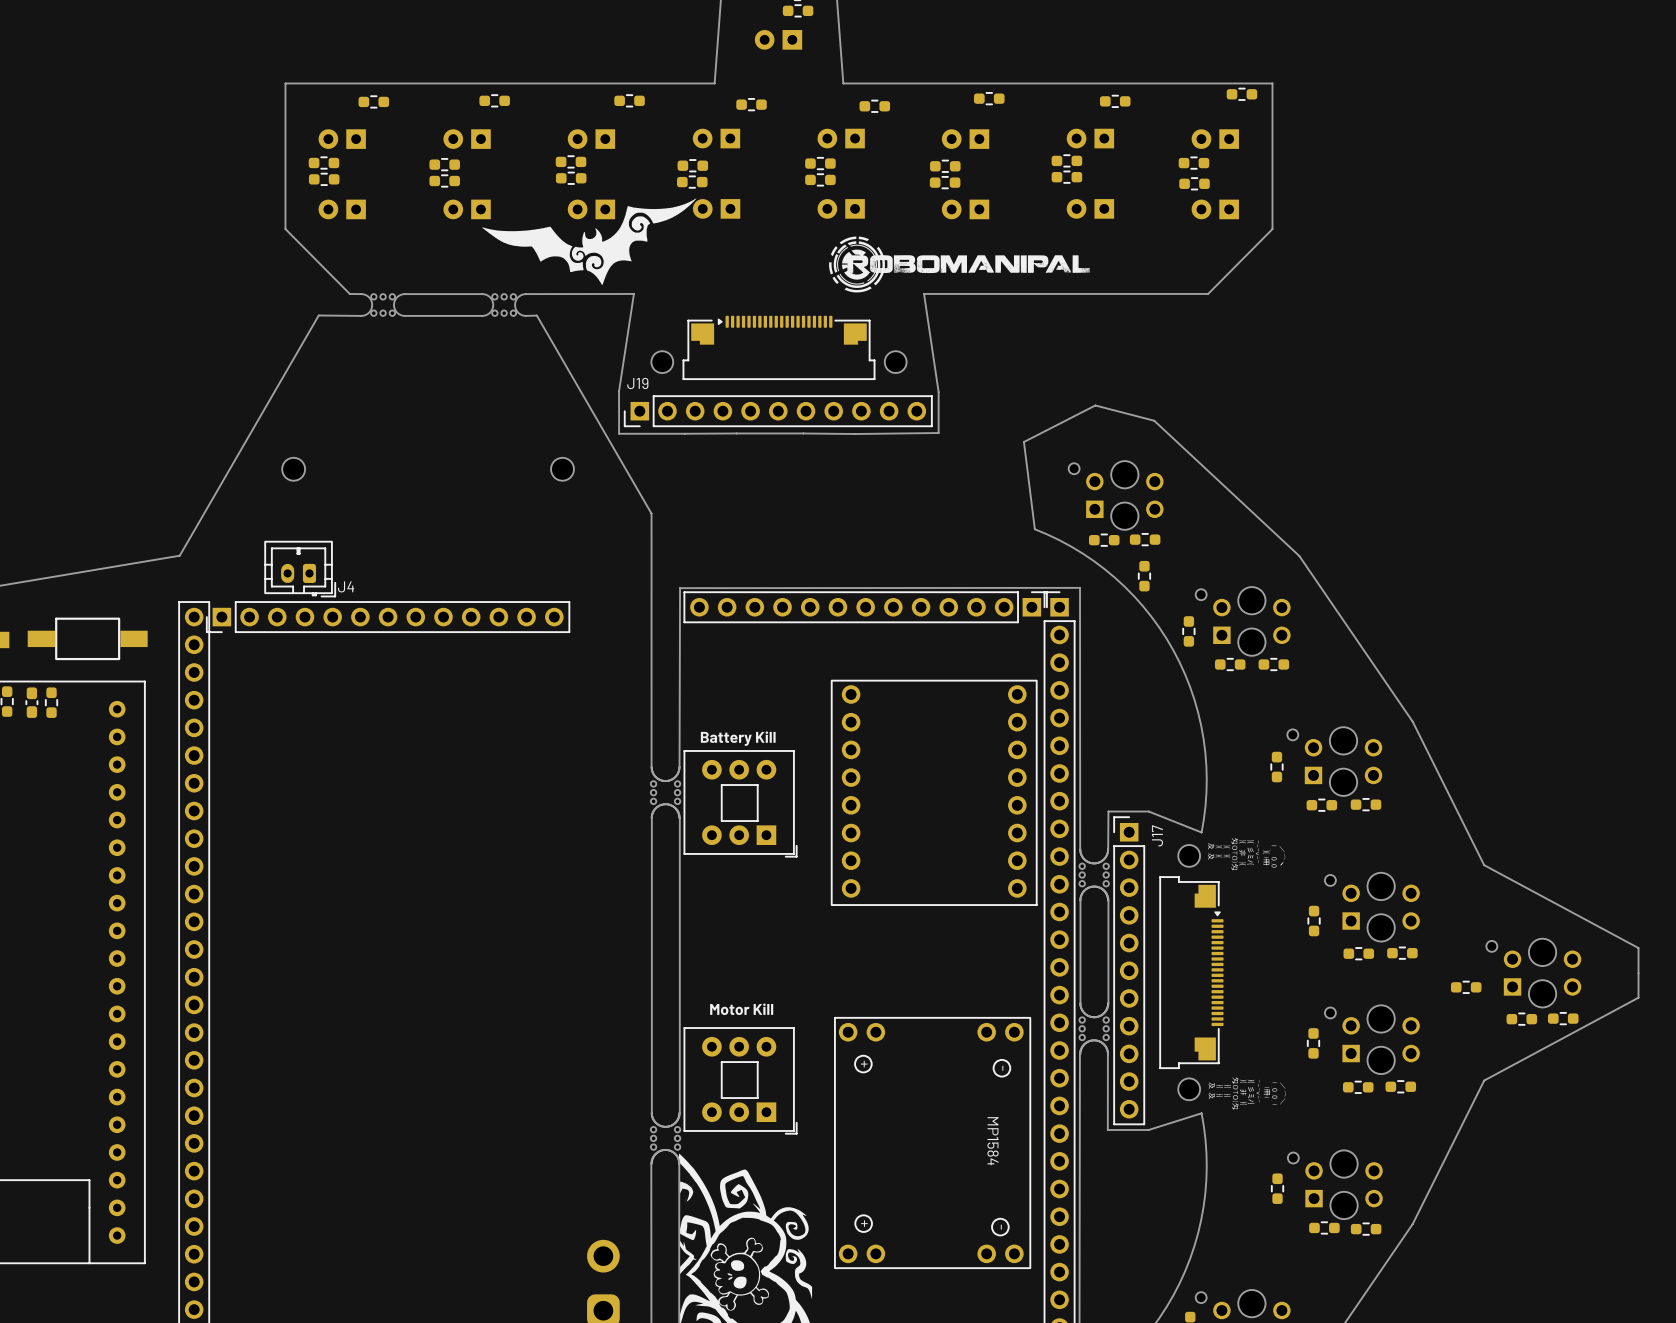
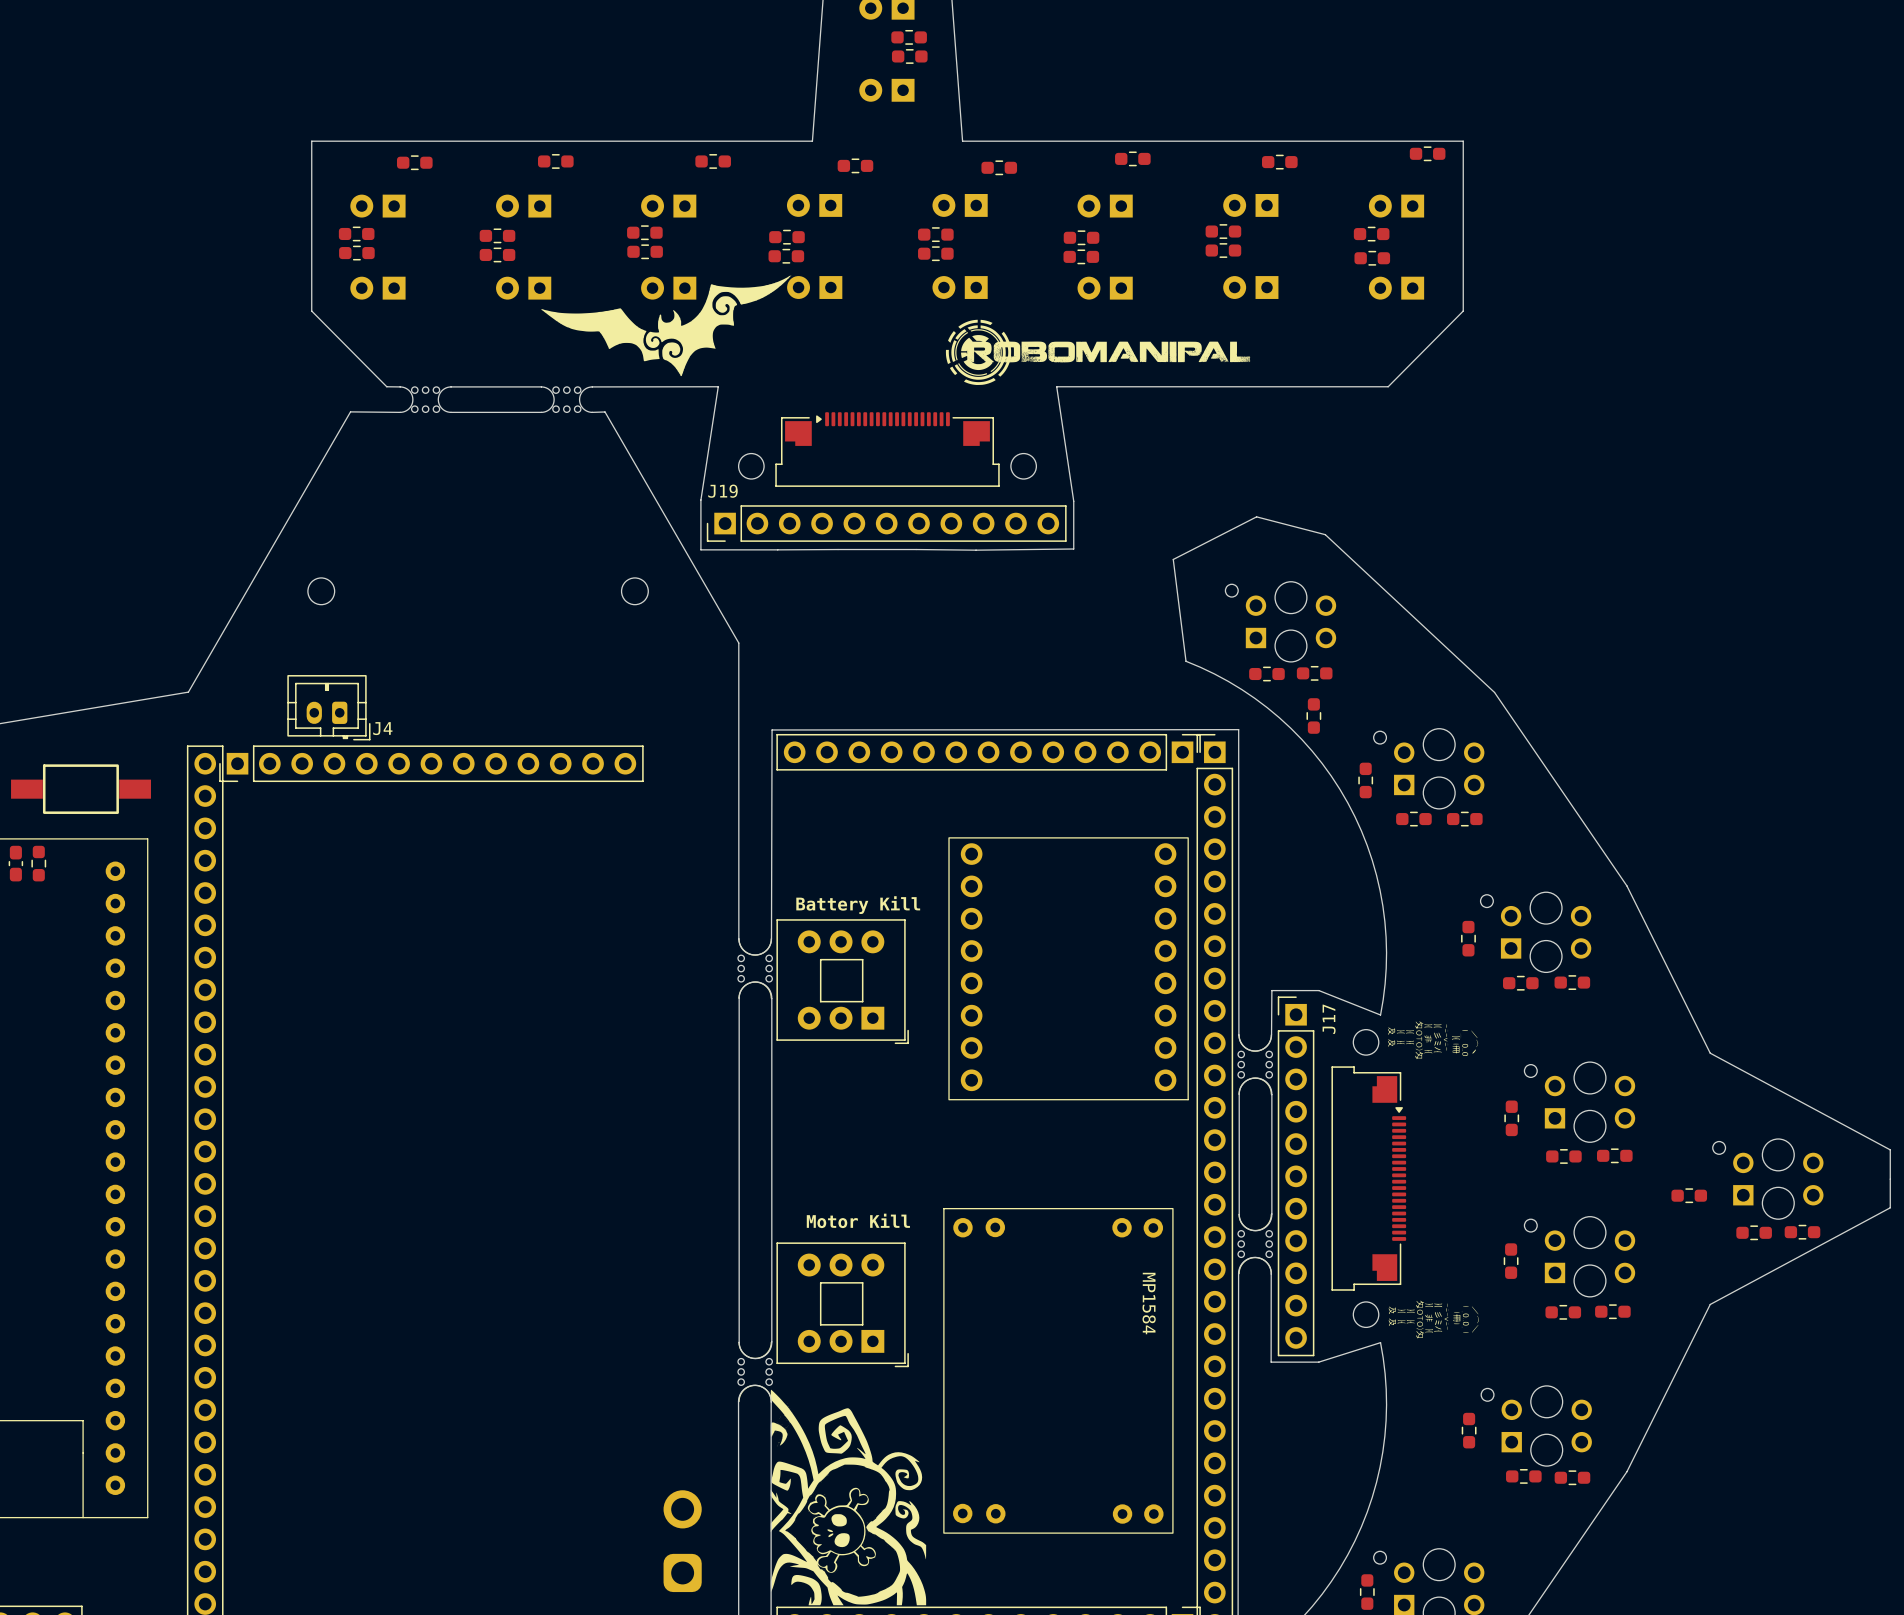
part footprint: [834, 1017, 1032, 1269] -> [943, 1208, 1174, 1534]
text: none -> MP1584 (1149, 1303)

